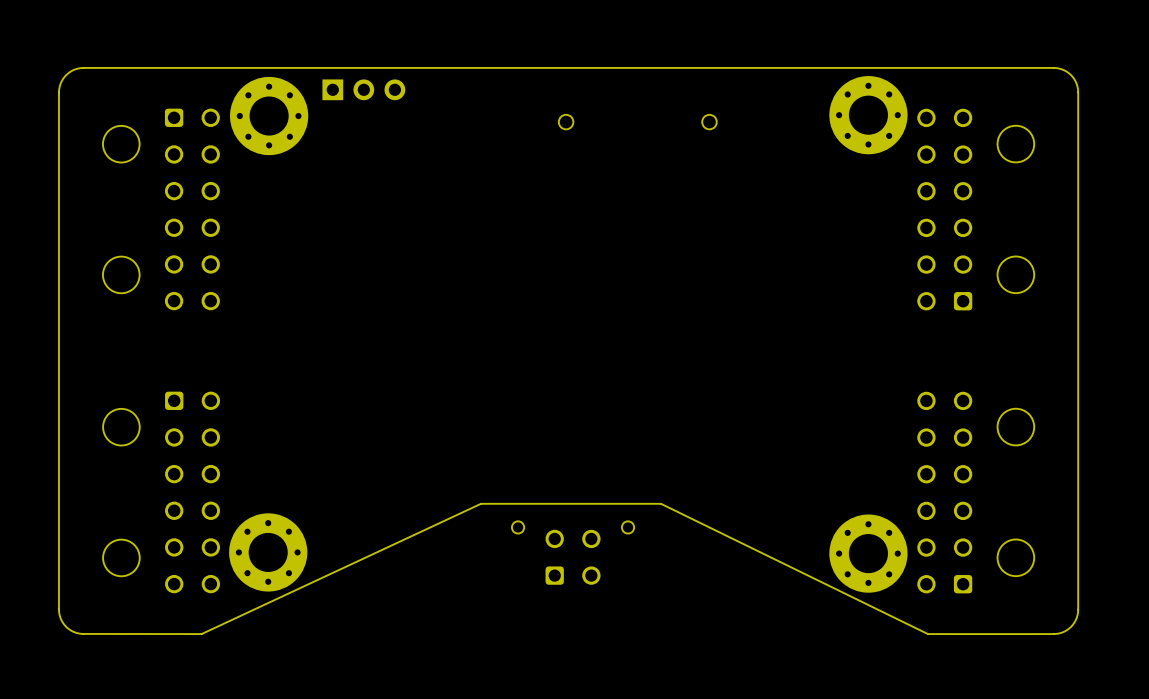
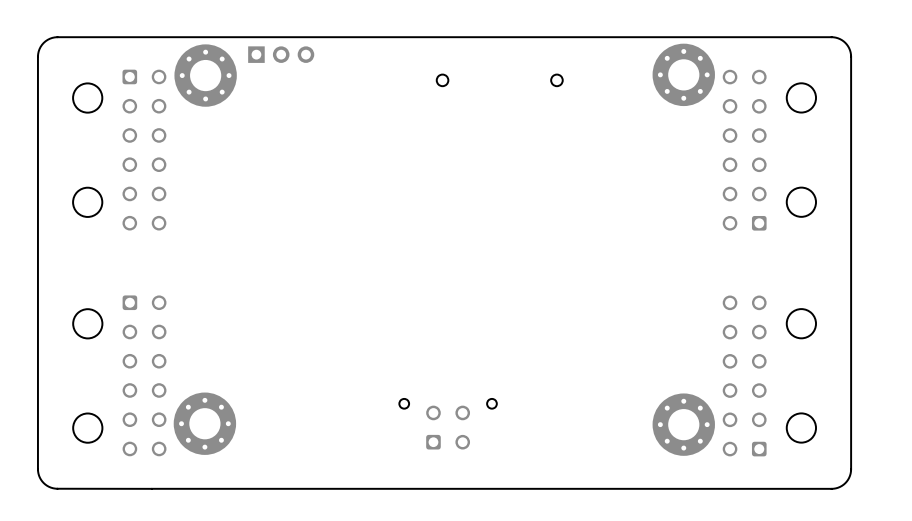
board edge: (927, 634) (660, 503) (480, 503) (201, 634) -> (731, 488) (151, 488)

